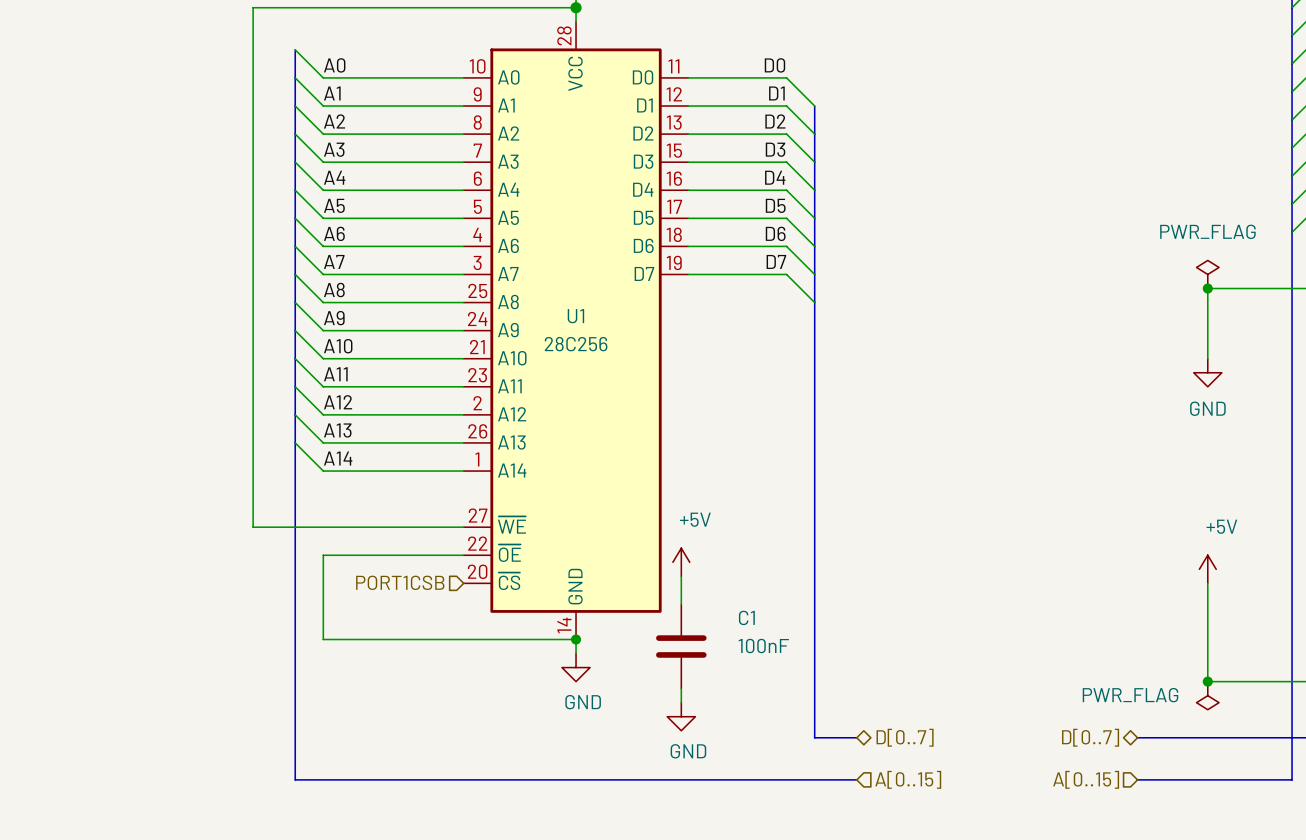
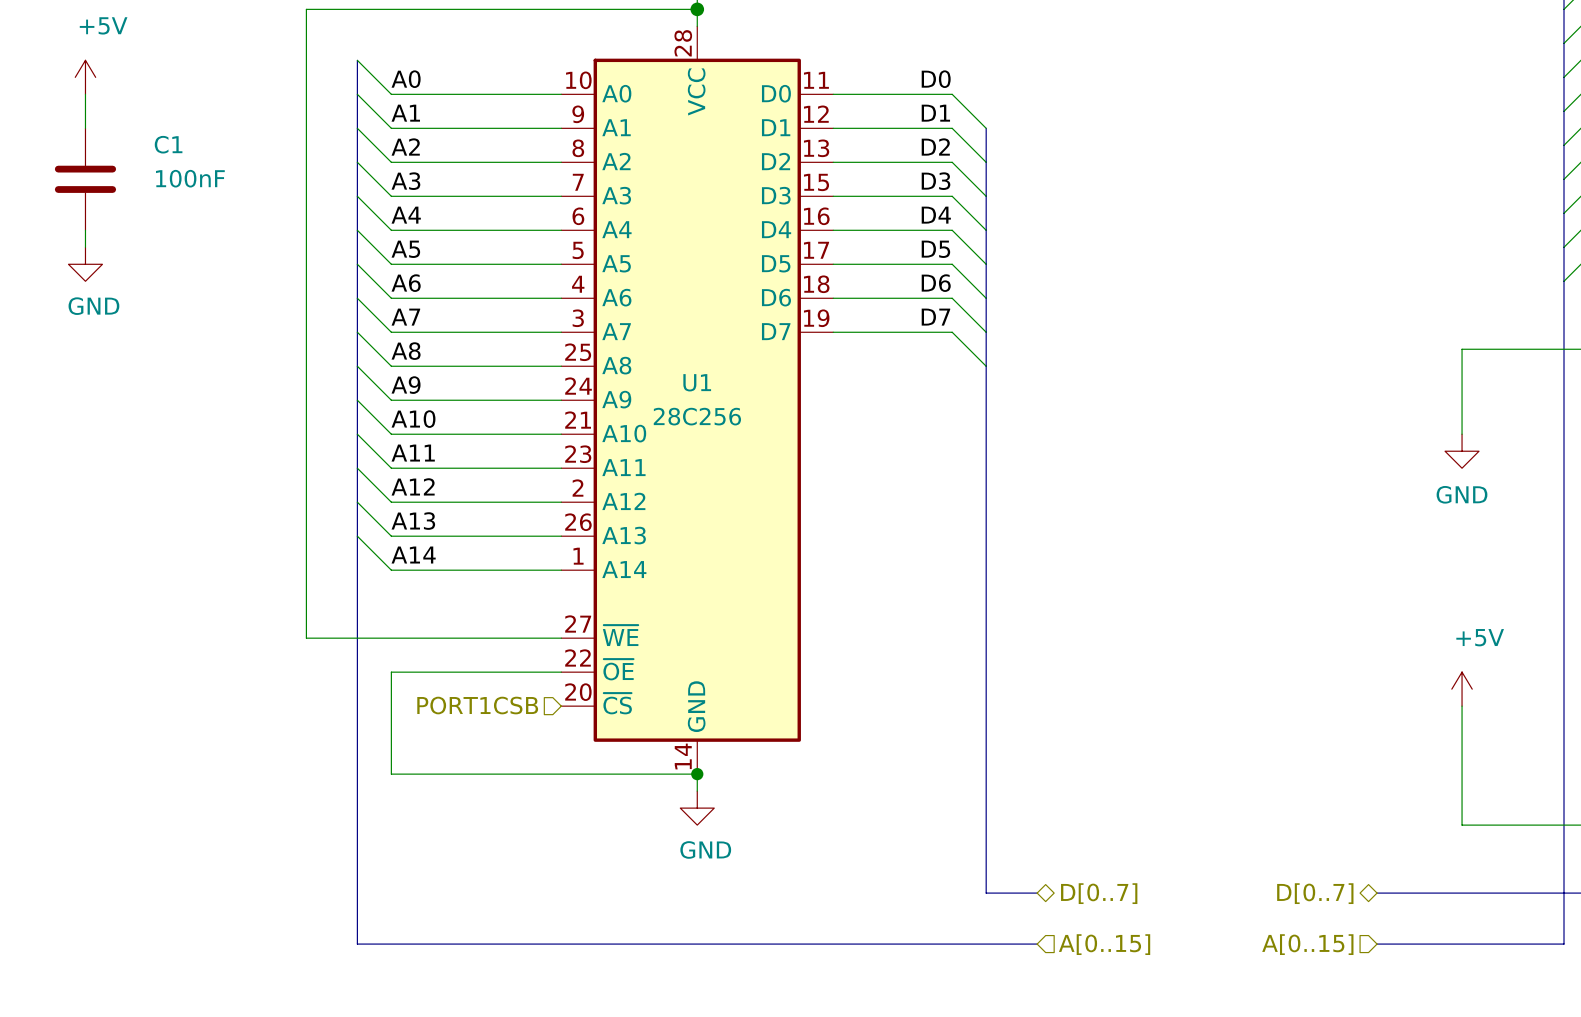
power symbol: none -> +5V (85, 77)
wire: none -> (85, 94) (85, 128)
wire: none -> (85, 230) (85, 247)
power symbol: none -> GND (85, 264)
power symbol: PWR_FLAG (1207, 274) -> none
junction: (1207, 288) -> none
power symbol: +5V (681, 562) -> none
wire: (681, 576) (681, 604) -> none
C1 position: (681, 646) -> (85, 179)
junction: (1207, 681) -> none
wire: (681, 688) (681, 702) -> none
power symbol: PWR_FLAG (1207, 695) -> none
power symbol: GND (681, 716) -> none

